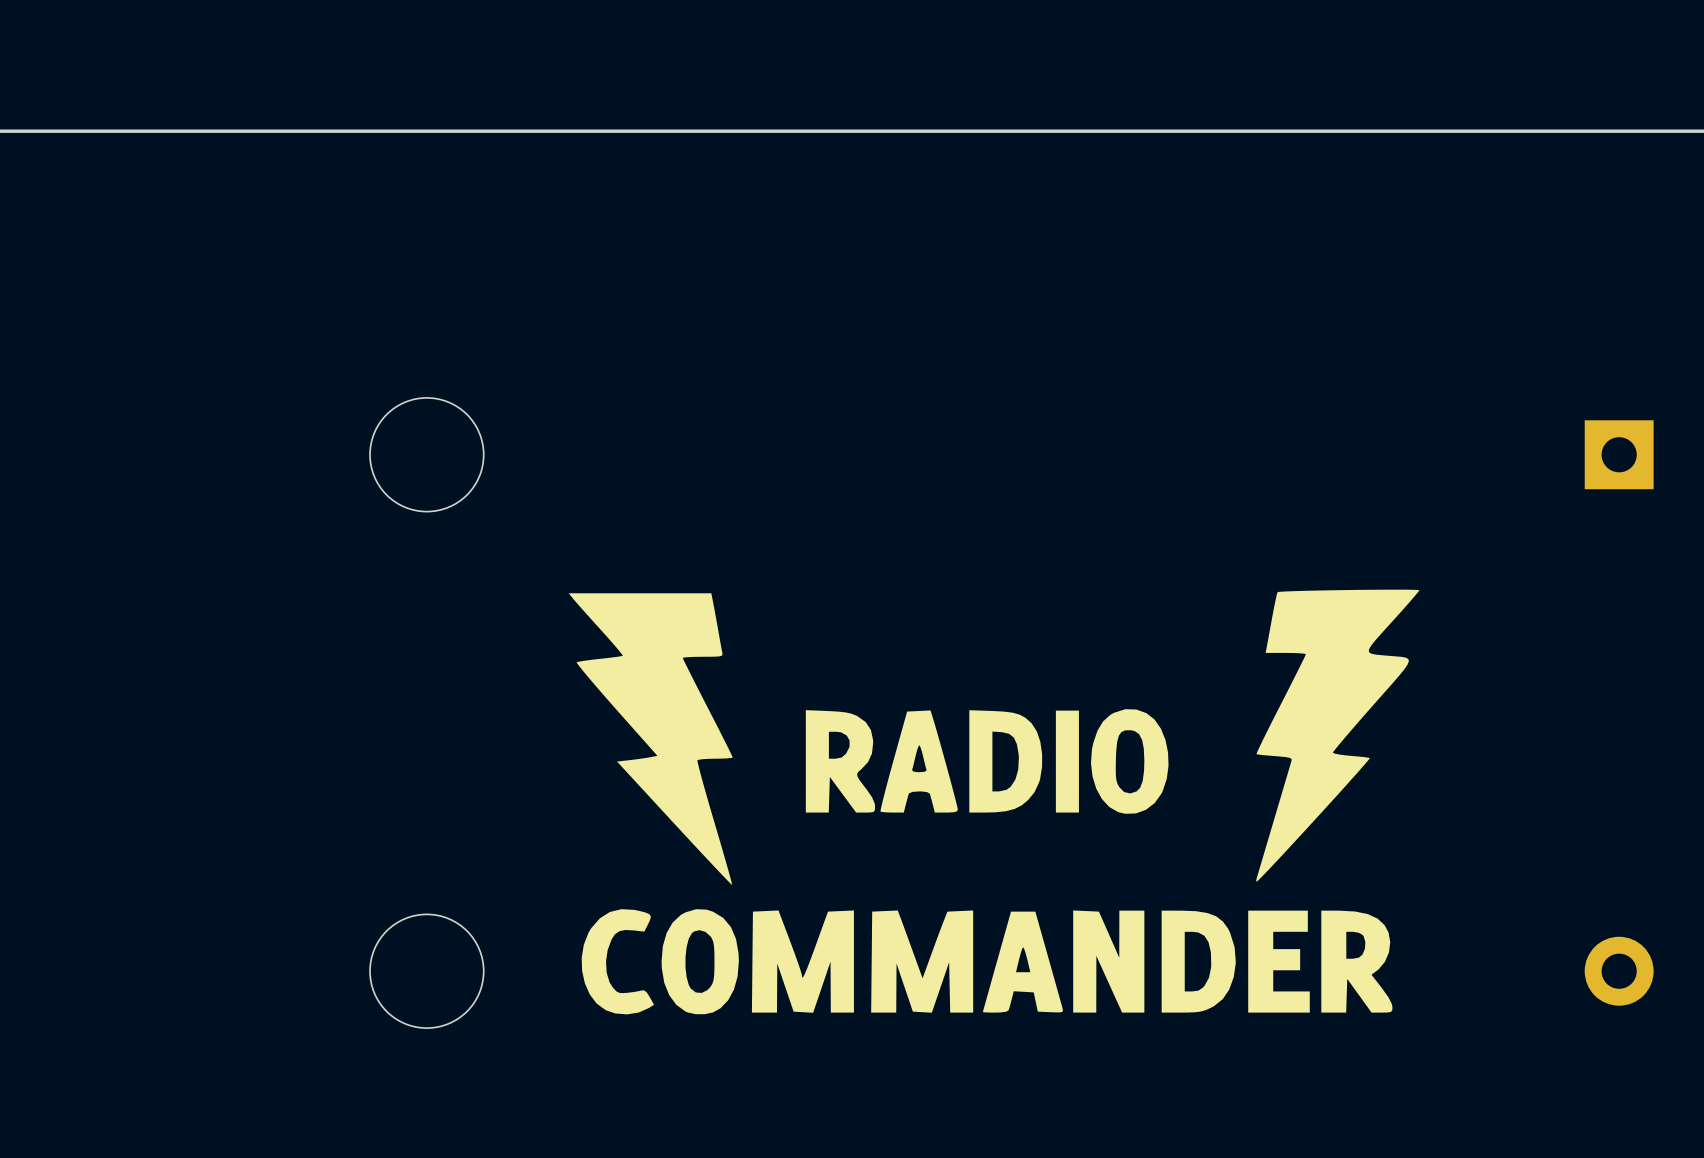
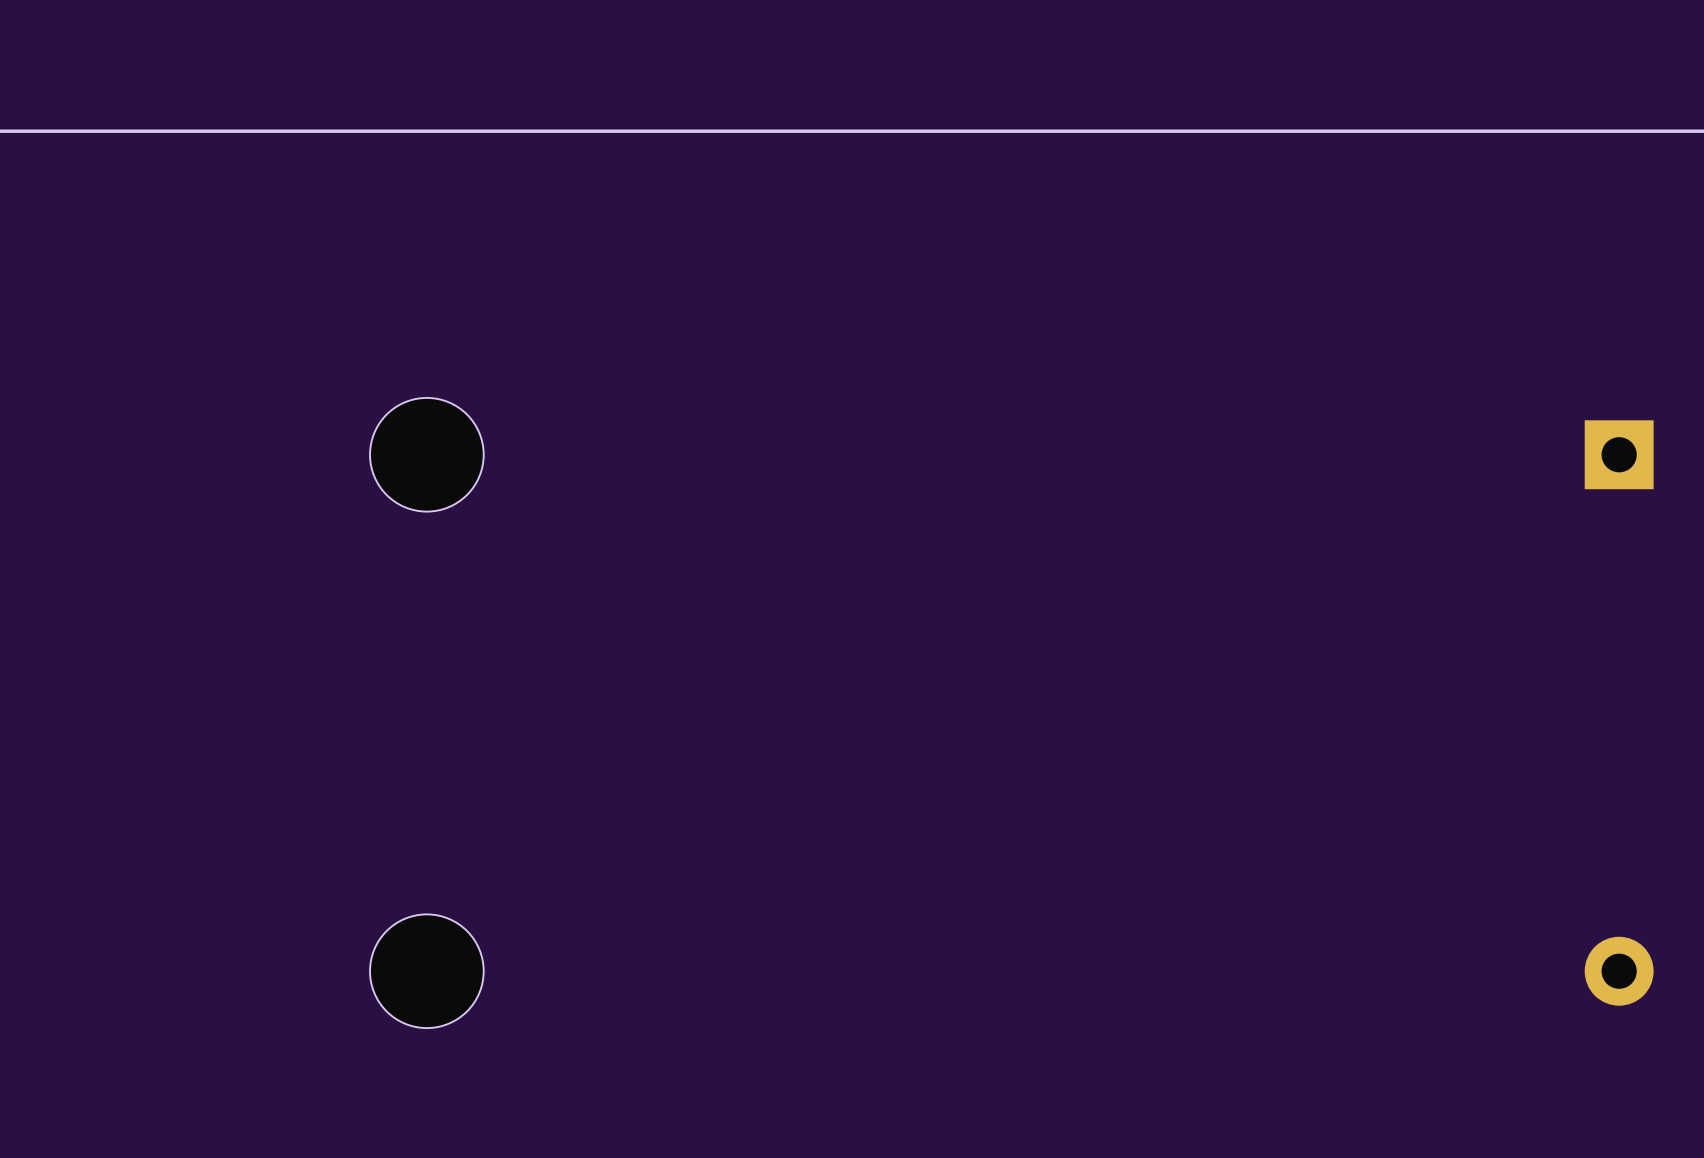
drawing: [568, 589, 1420, 1015] -> none

